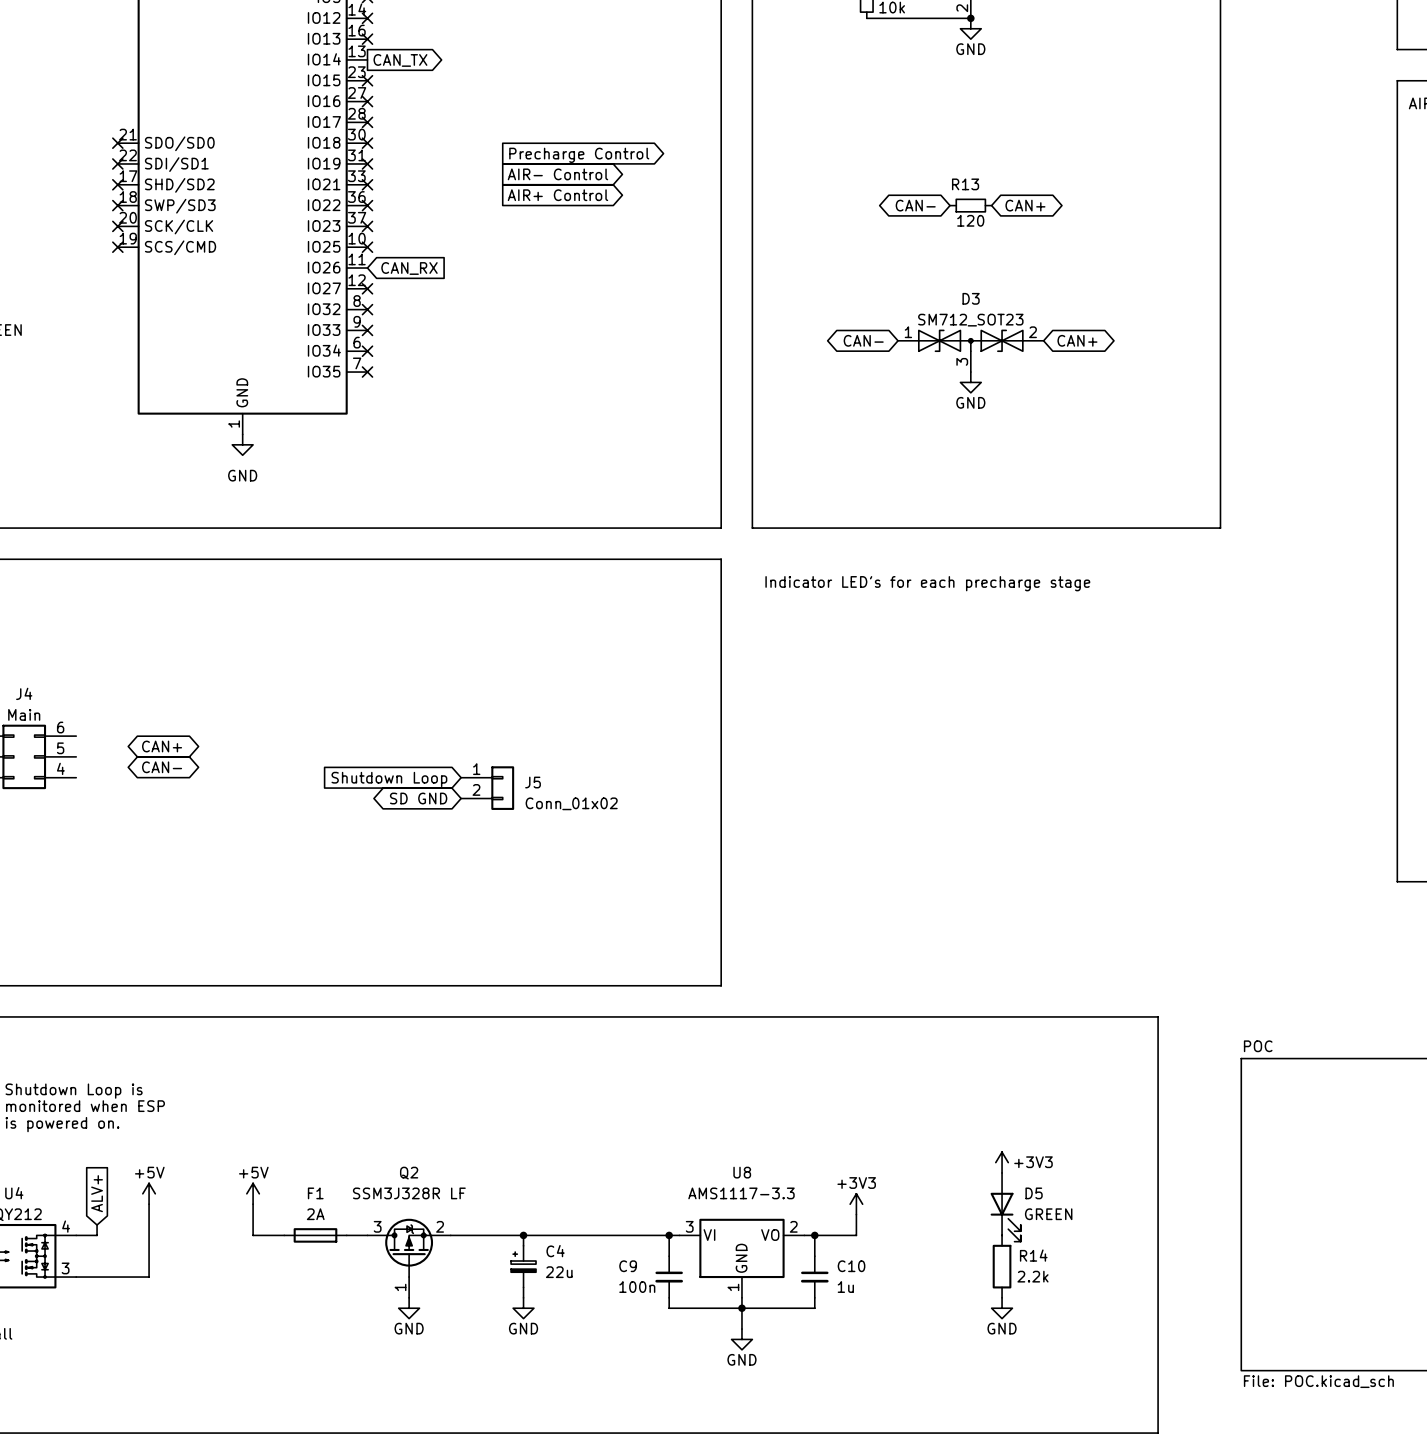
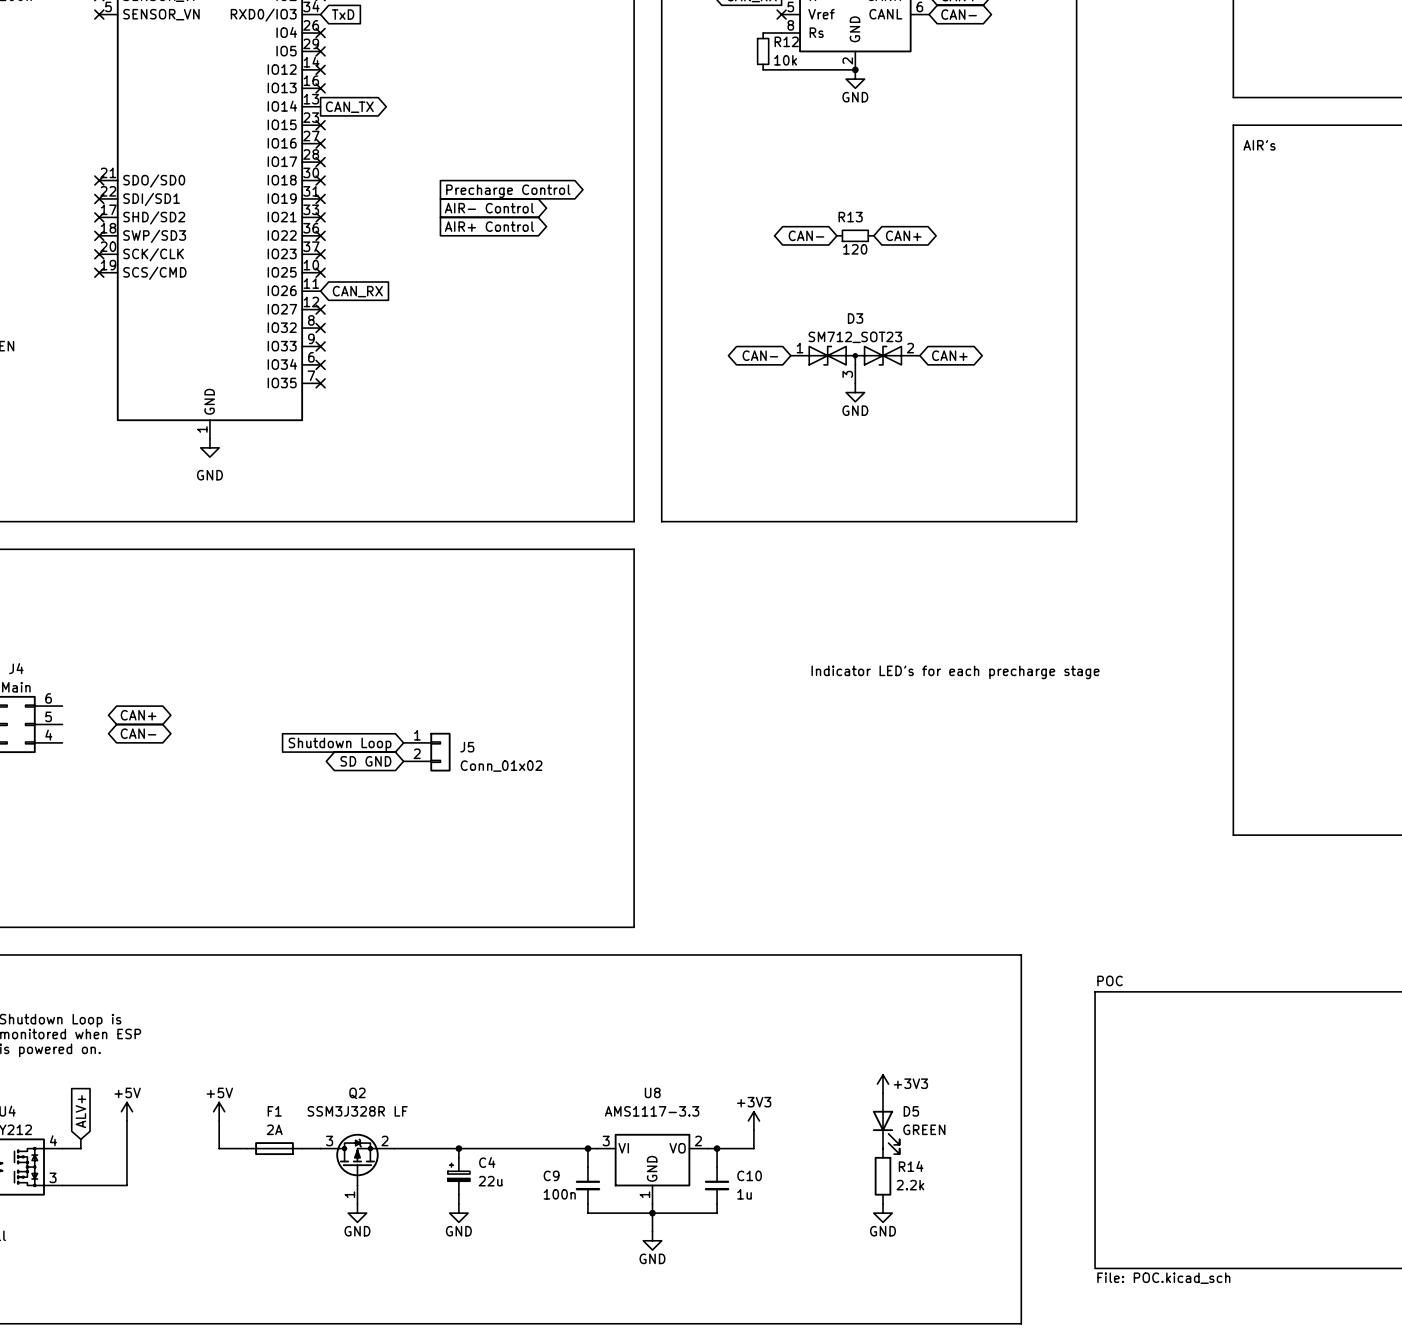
text position: Indicator LED's for each precharge stage (927, 583) -> Indicator LED's for each precharge stage (955, 672)

